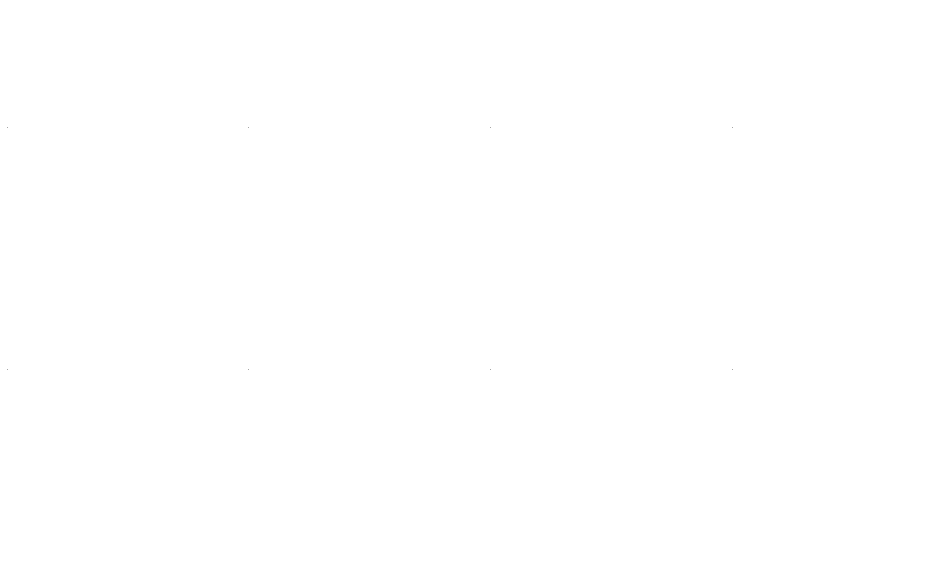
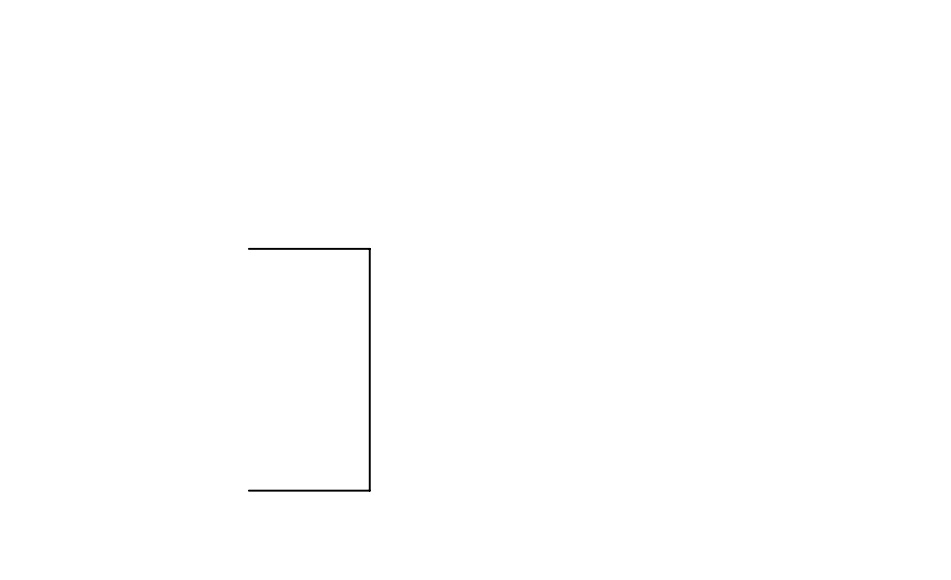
wire: none -> (248, 248) (369, 248) (369, 490) (248, 490)

